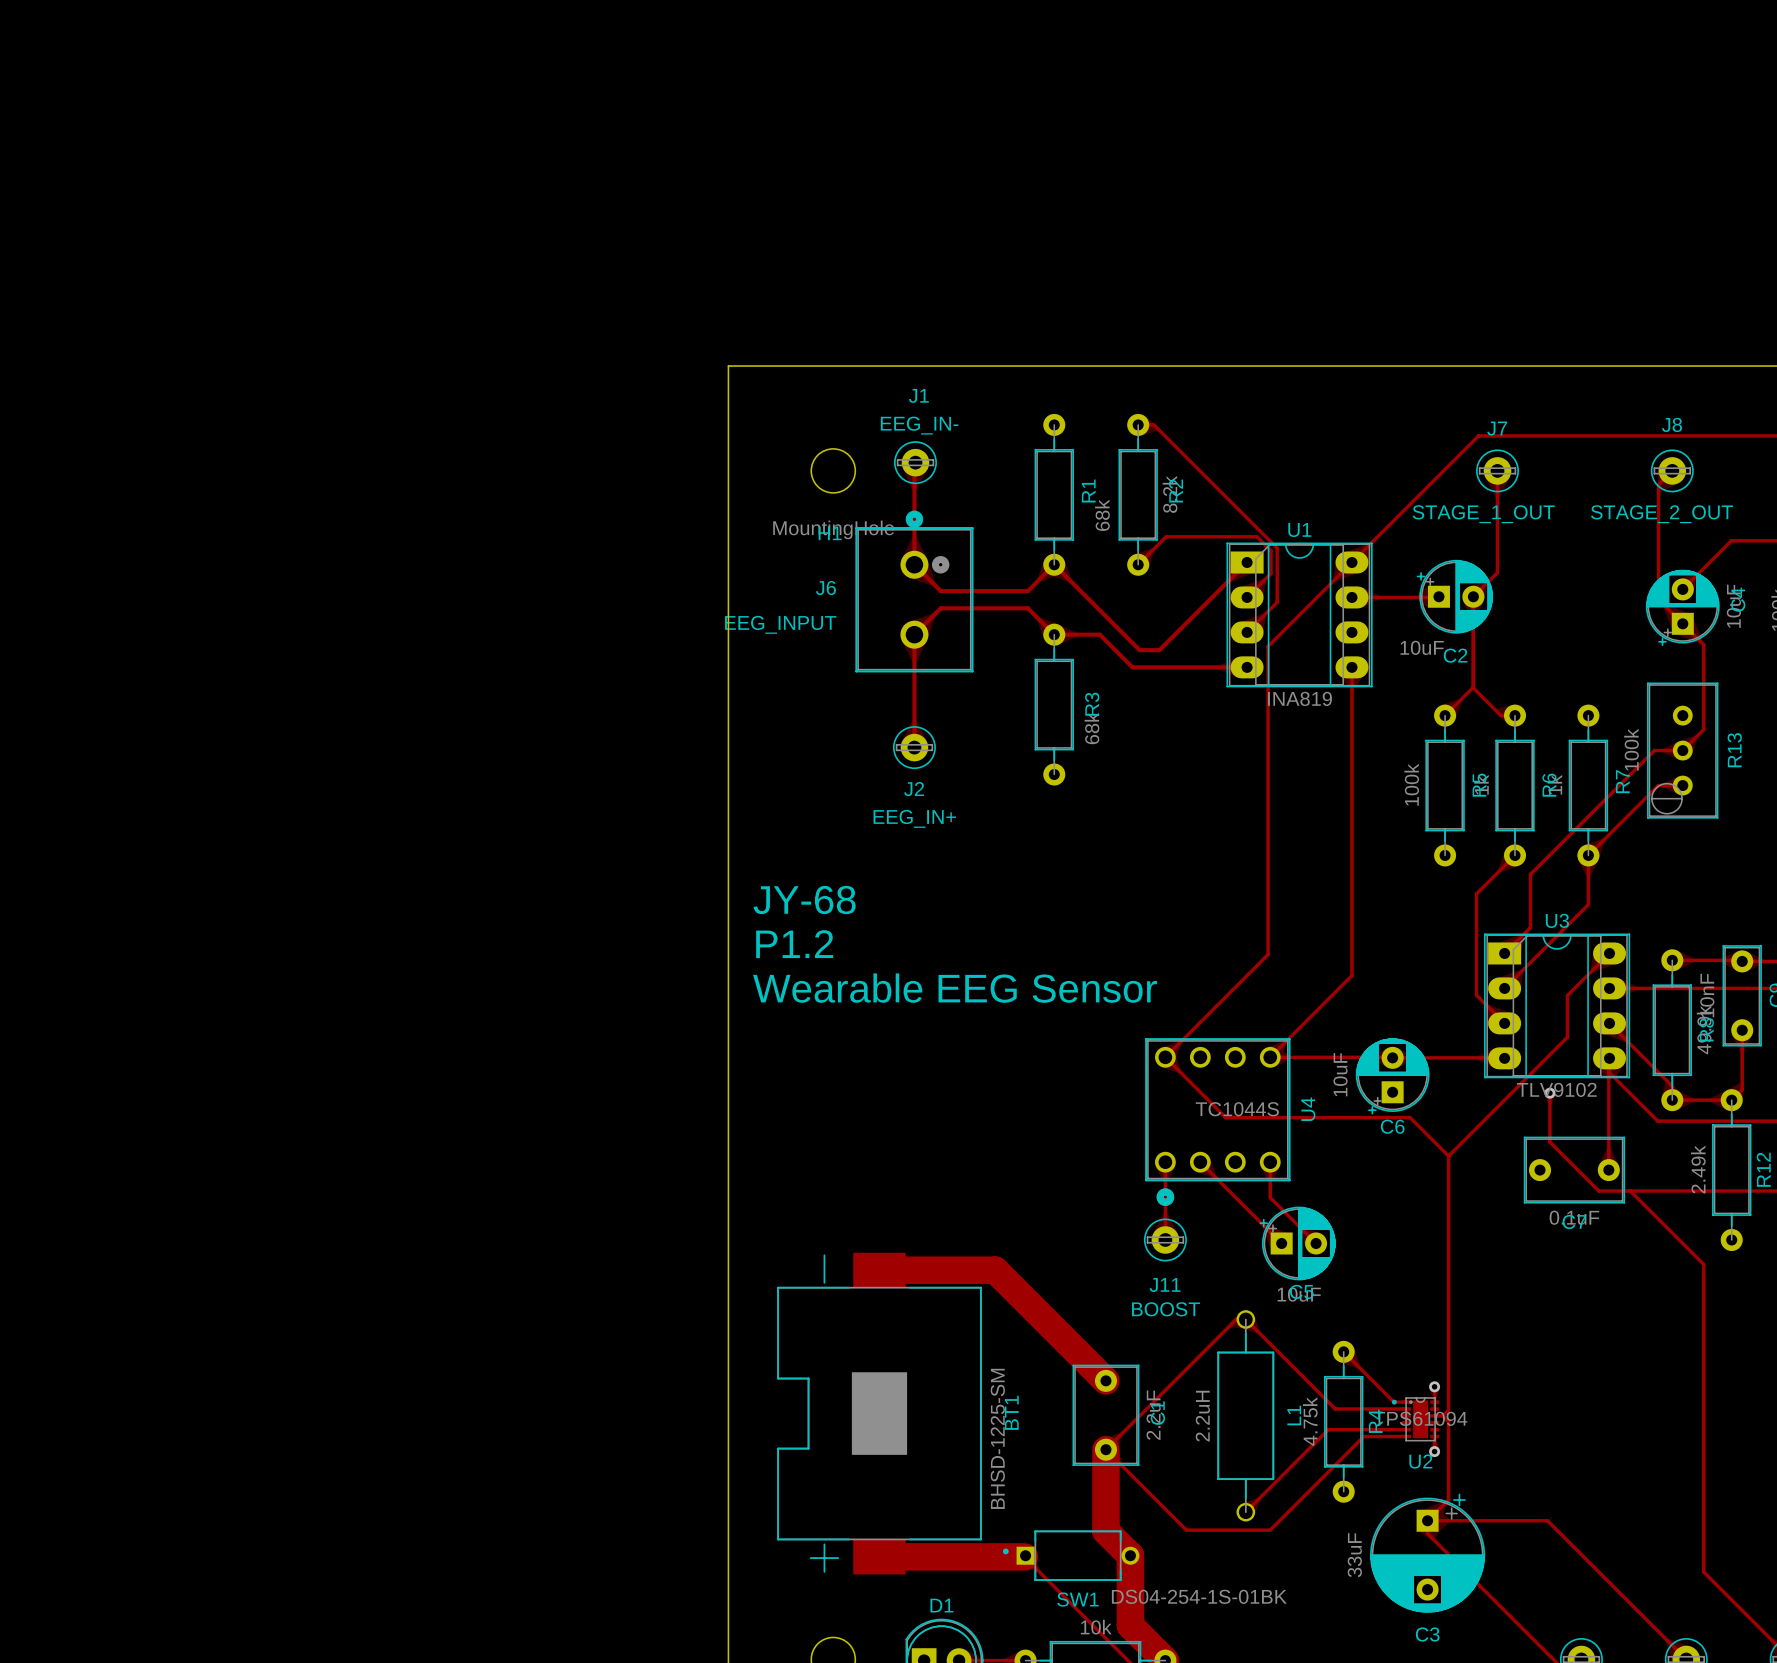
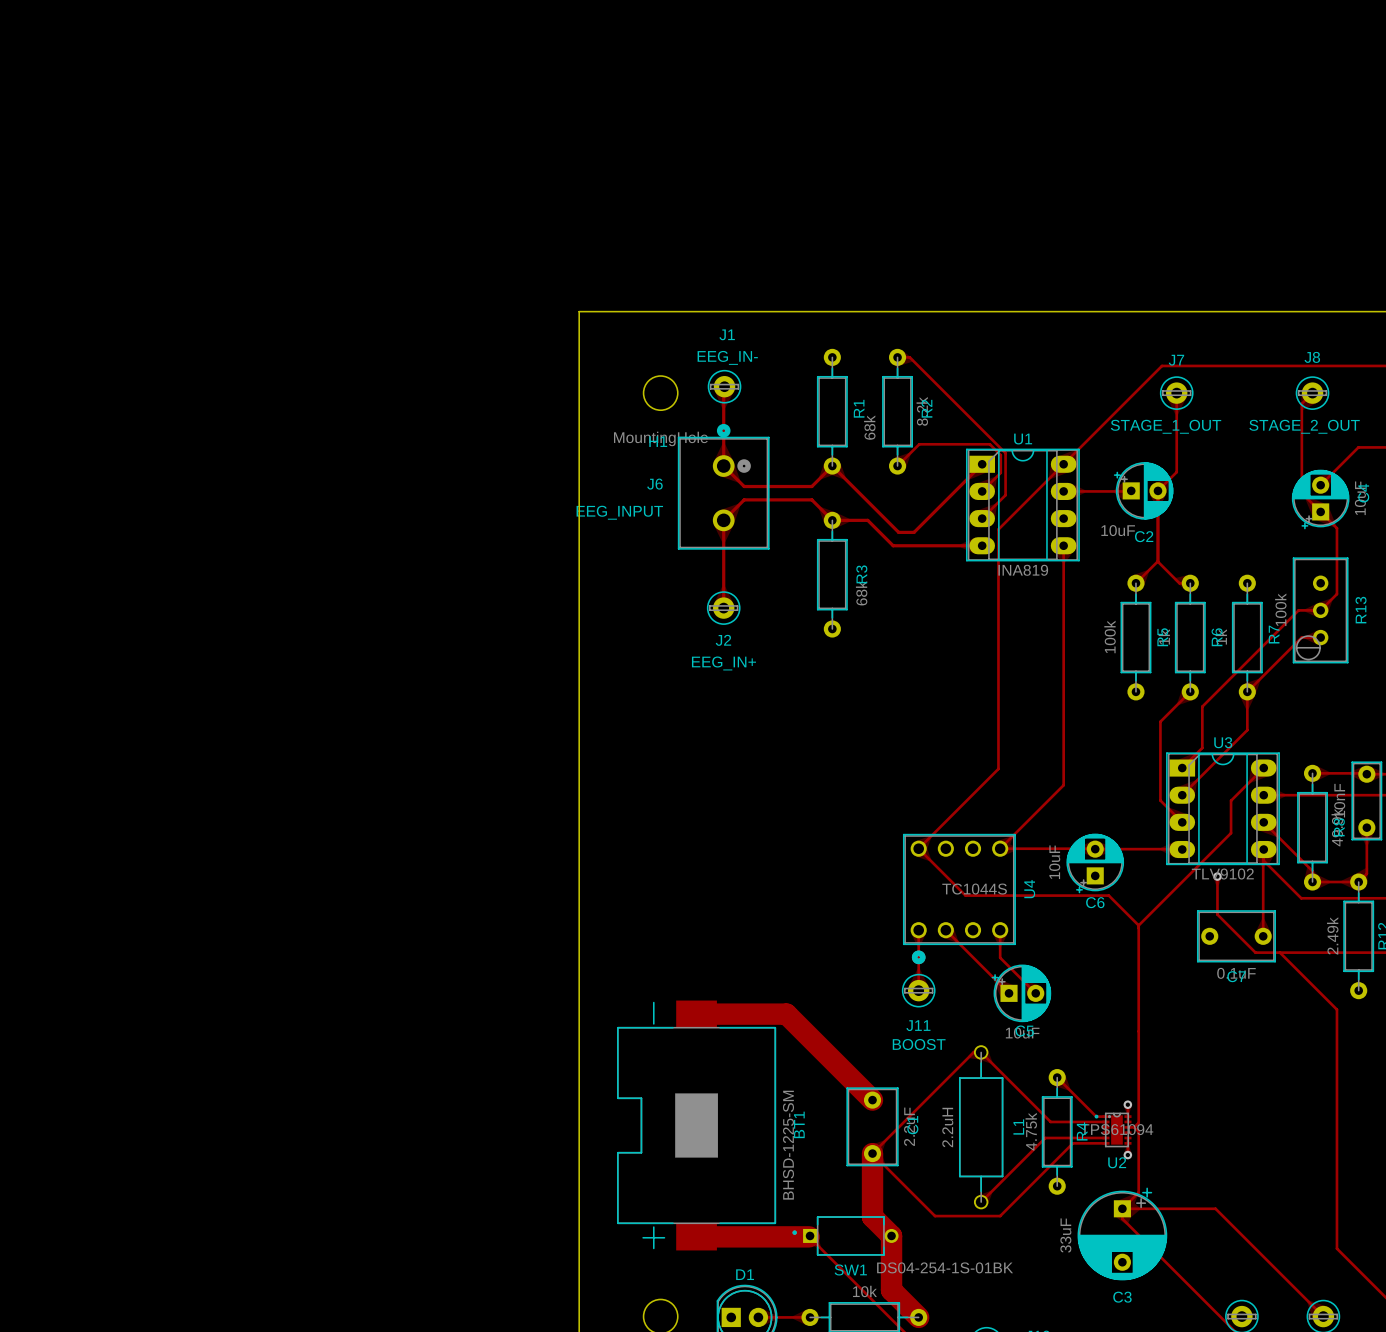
text: JY-68 (804, 899) -> none
text: P1.2 (794, 944) -> none
text: Wearable EEG Sensor (955, 988) -> none

